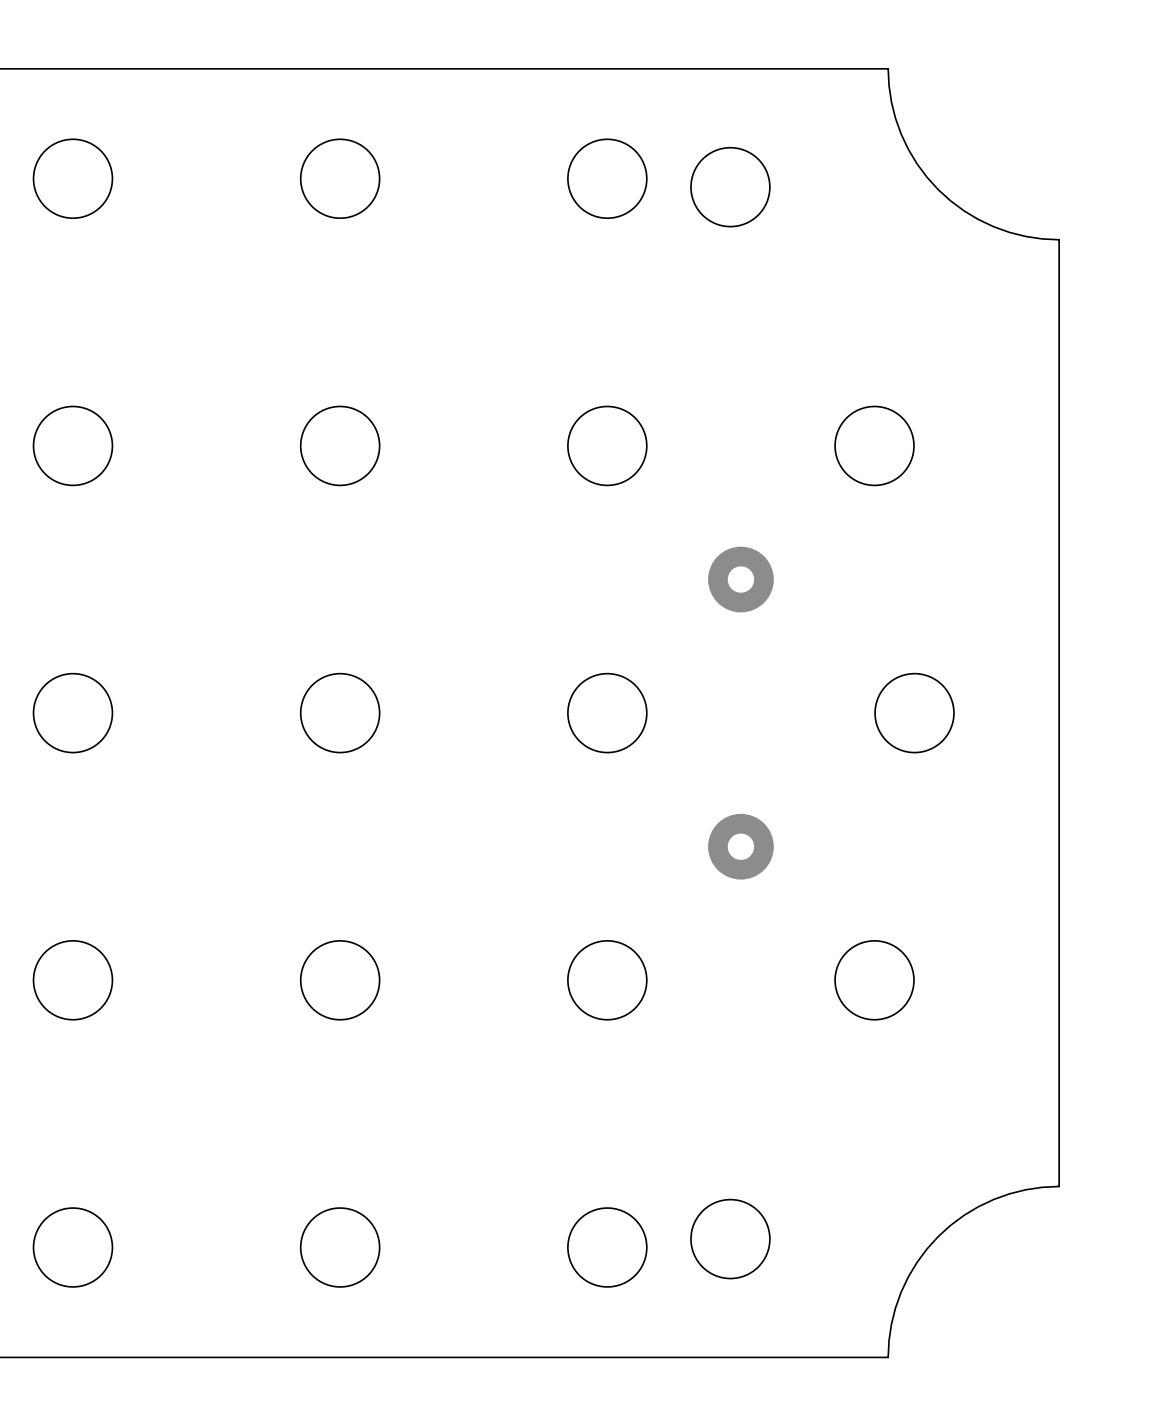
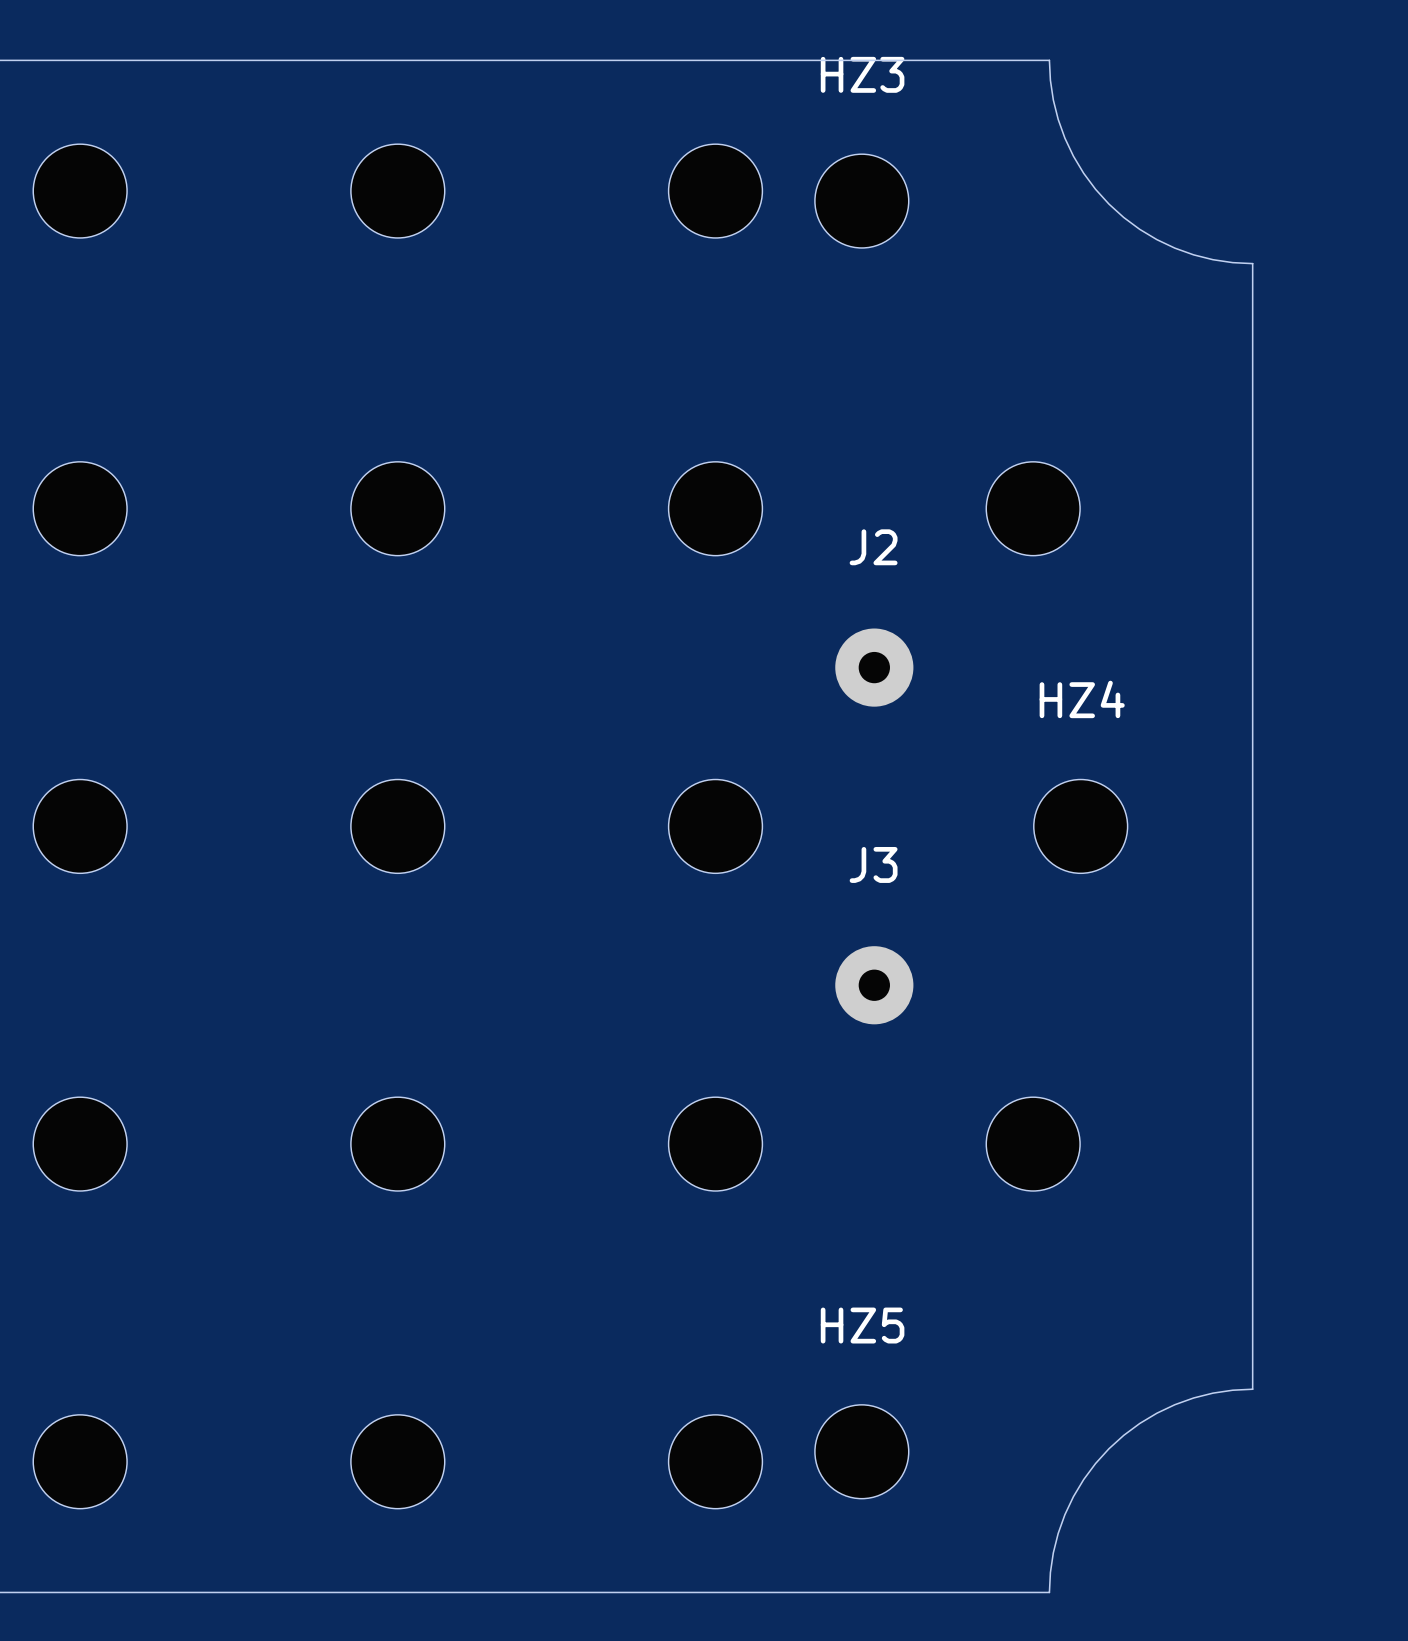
HZ3 name: none -> HZ3 (862, 74)
J2 name: none -> J2 (873, 547)
HZ4 name: none -> HZ4 (1082, 699)
J3 name: none -> J3 (873, 864)
HZ5 name: none -> HZ5 (862, 1325)

